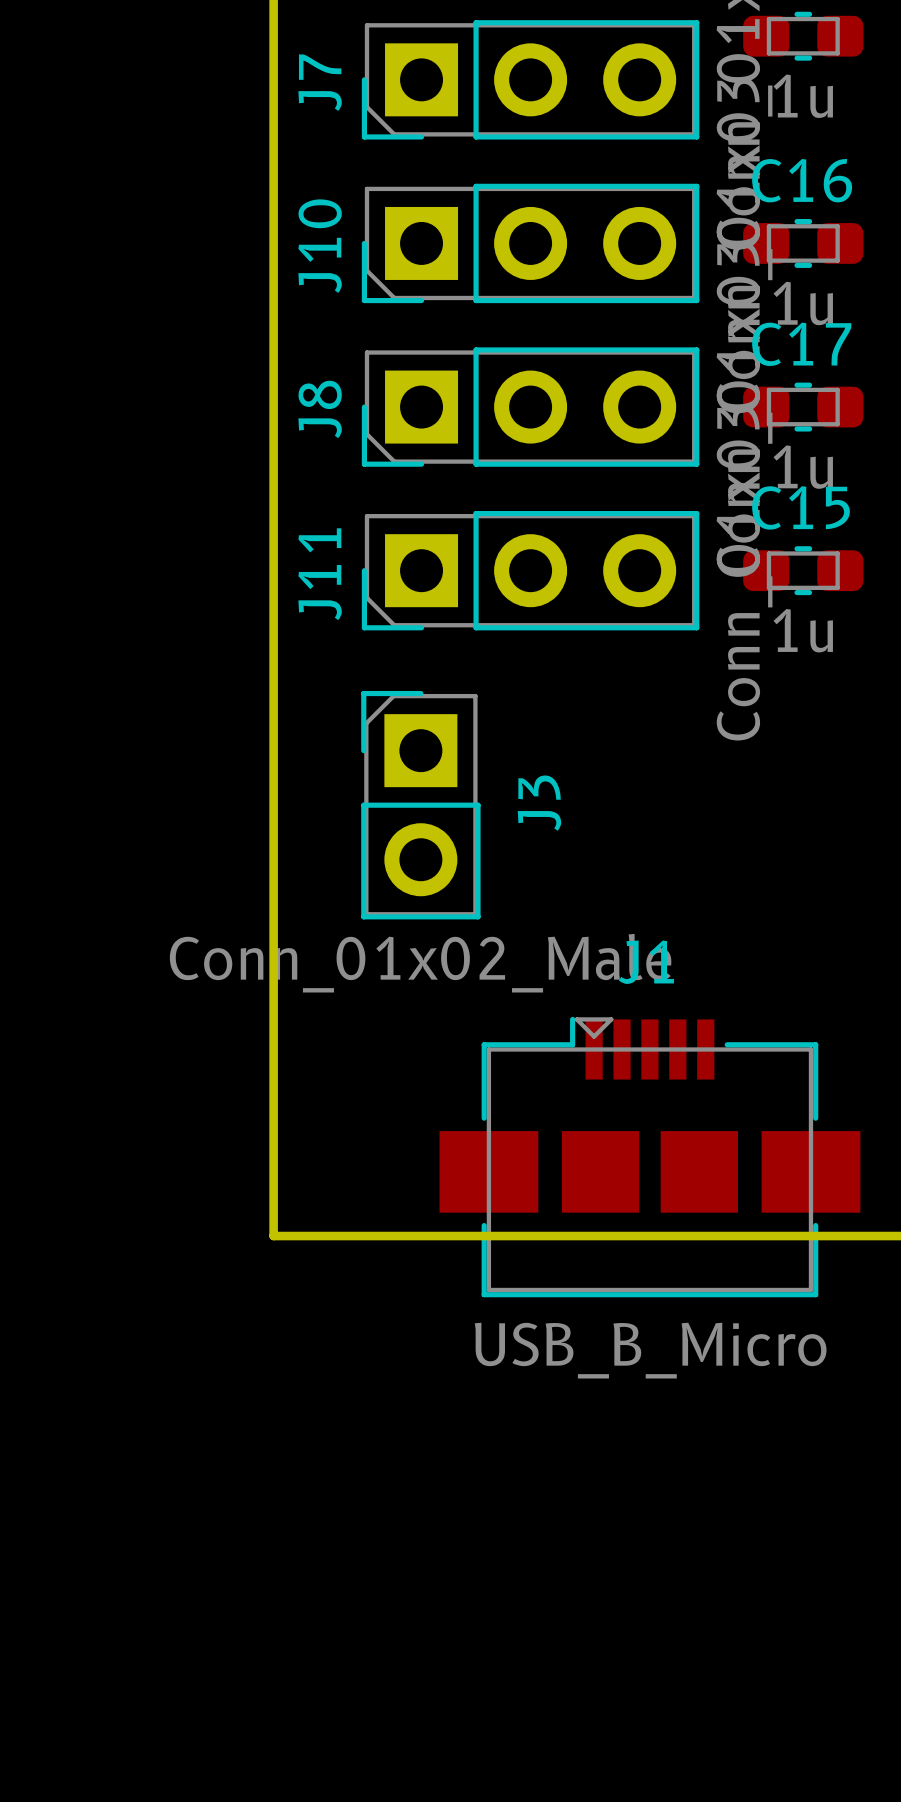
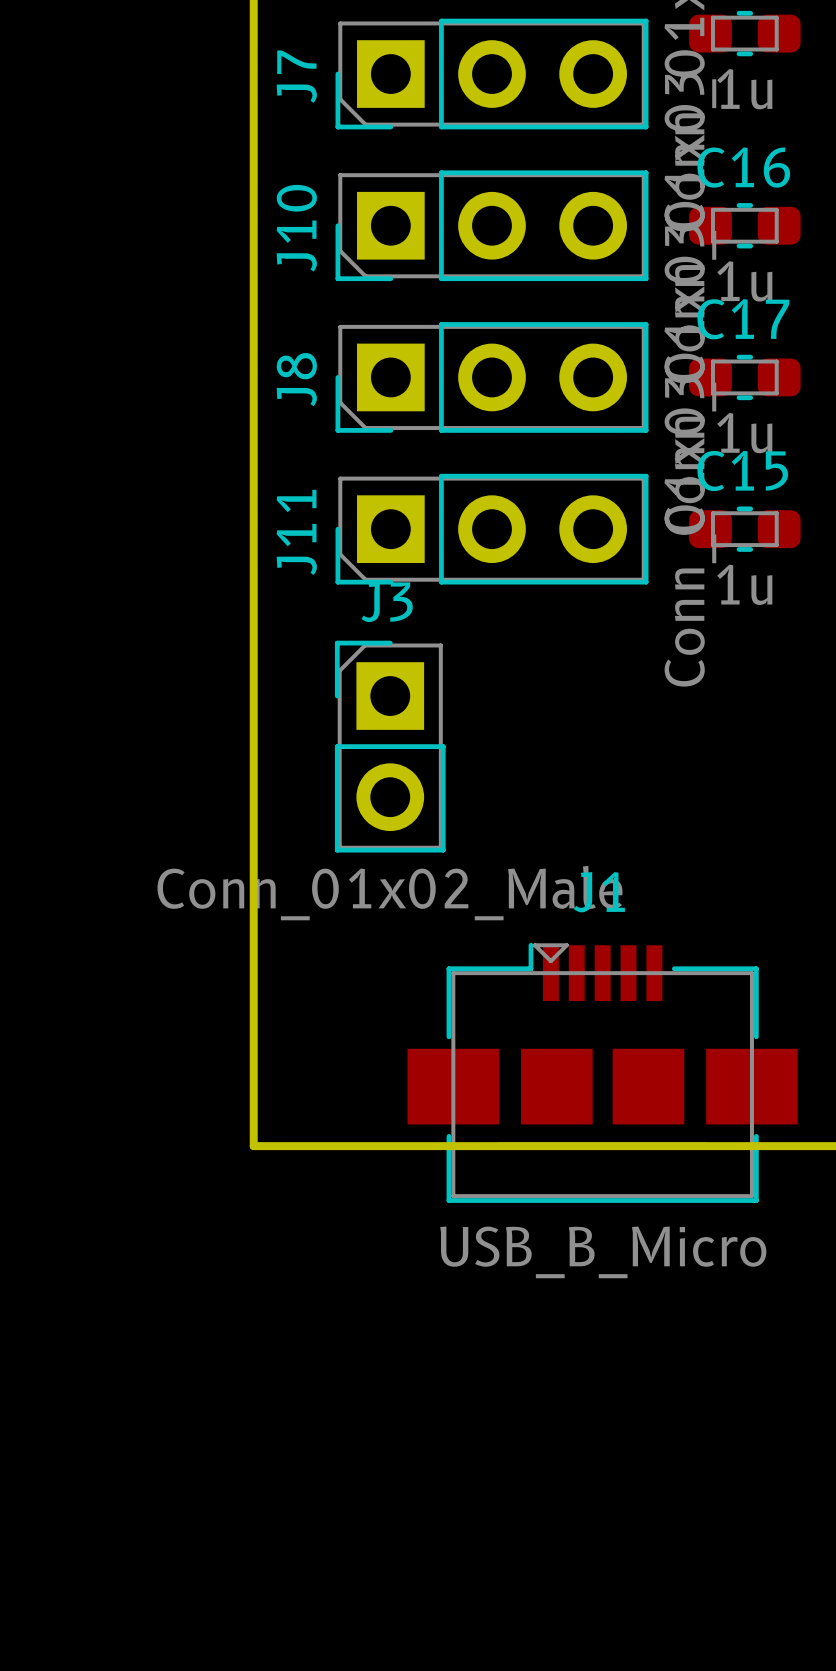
J3 name rotation: 0° (539, 803) -> 90° clockwise (387, 601)
J3 name position: J3 (539, 803) -> J3 (387, 601)

